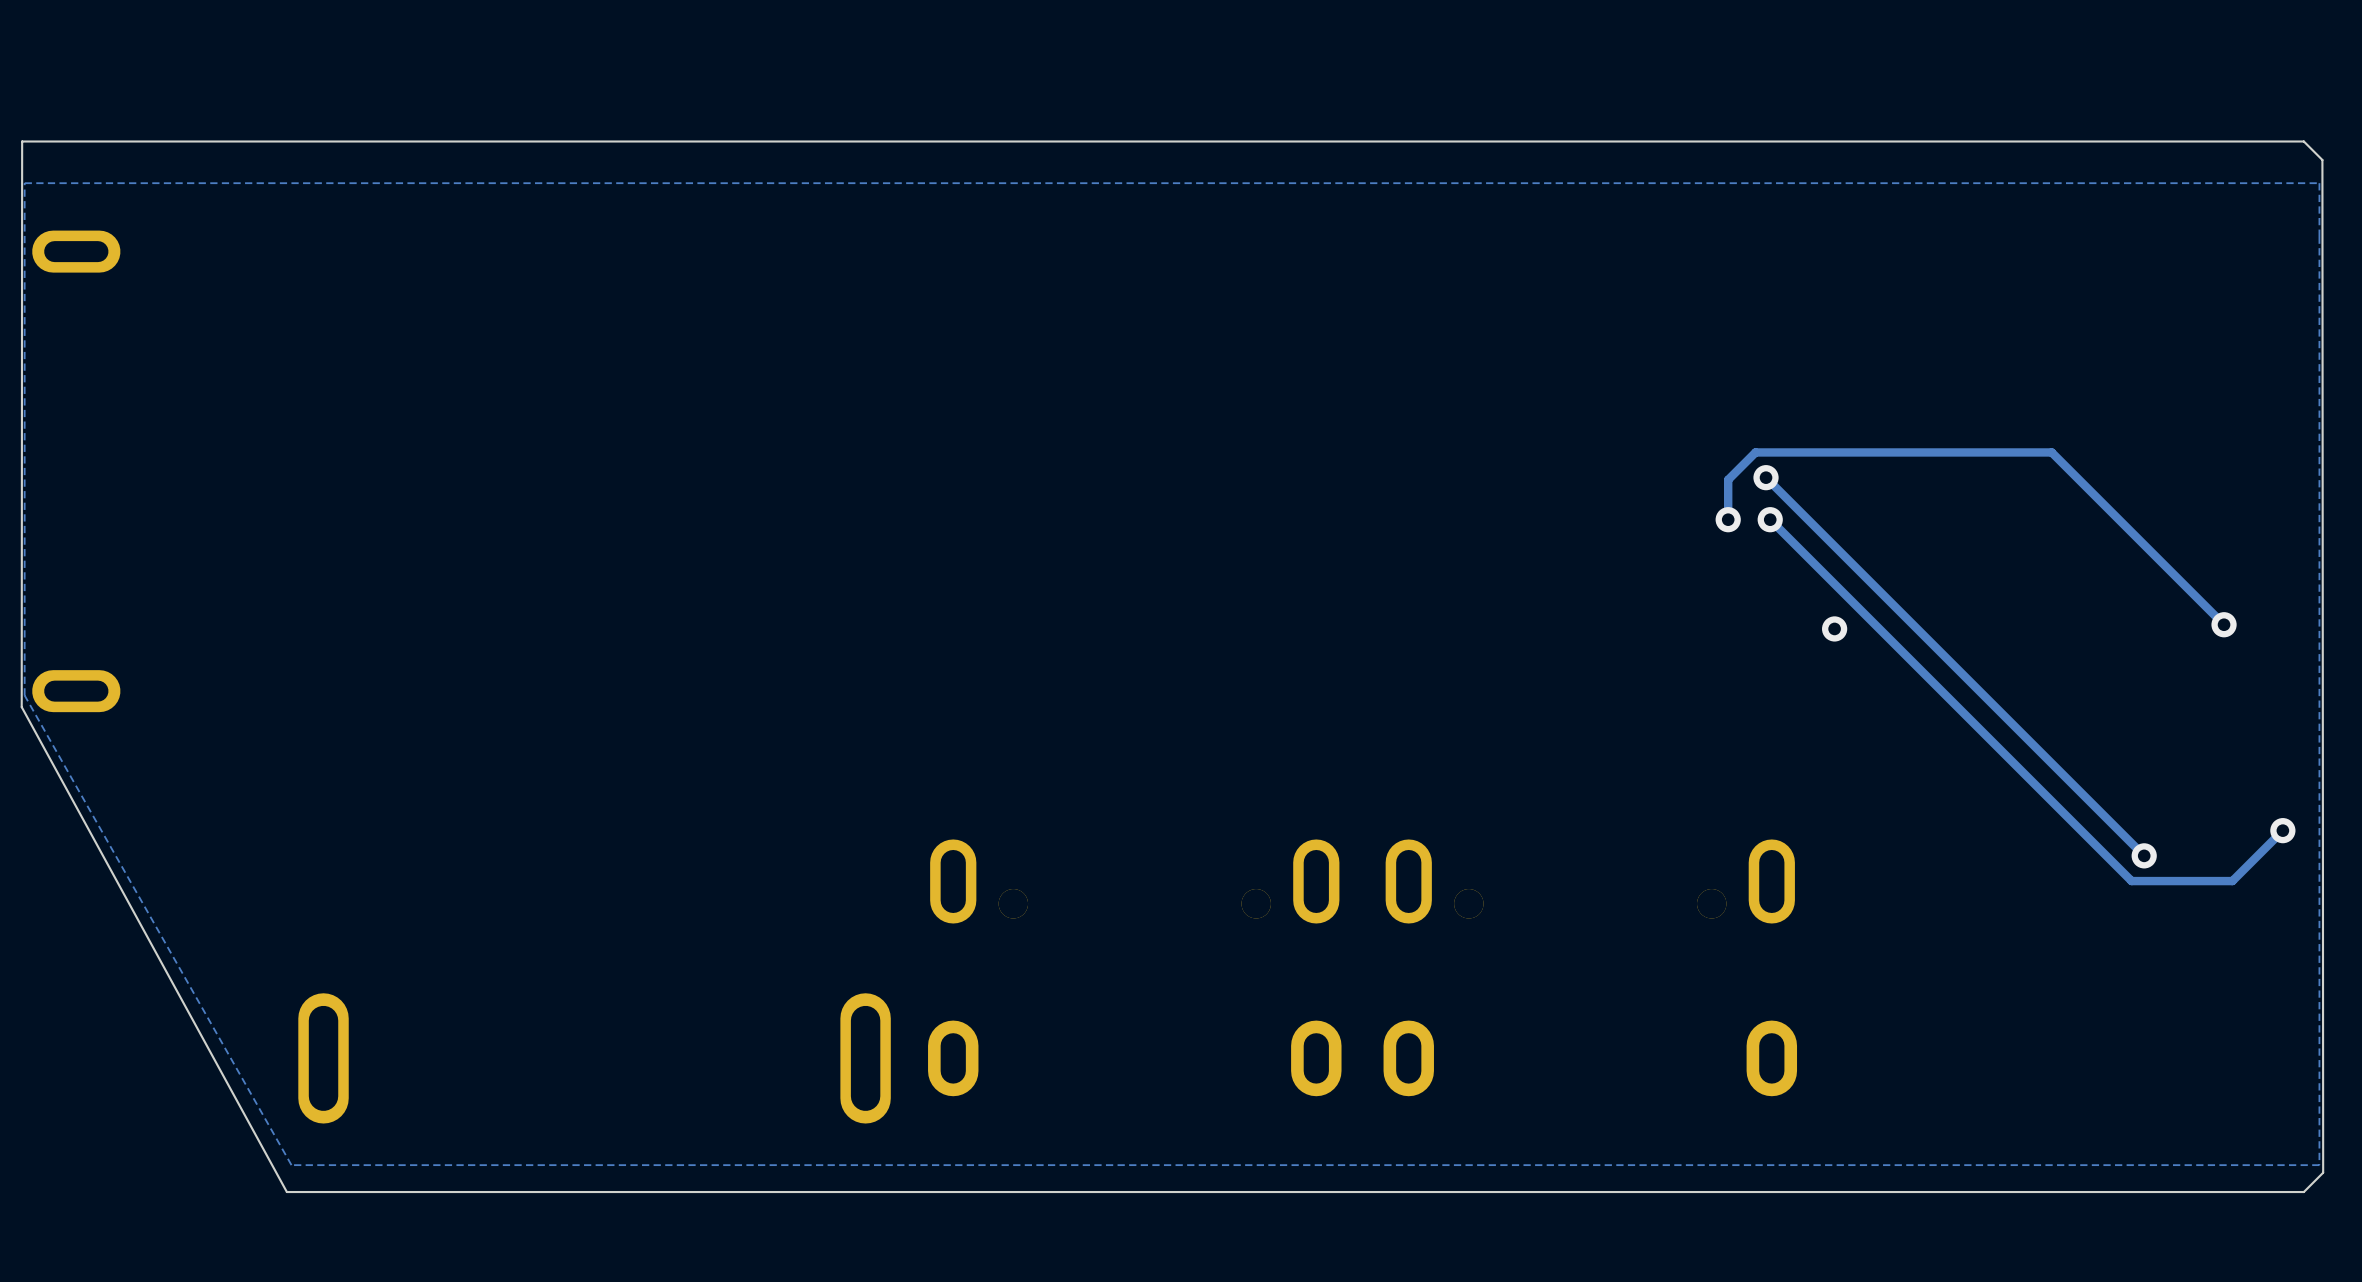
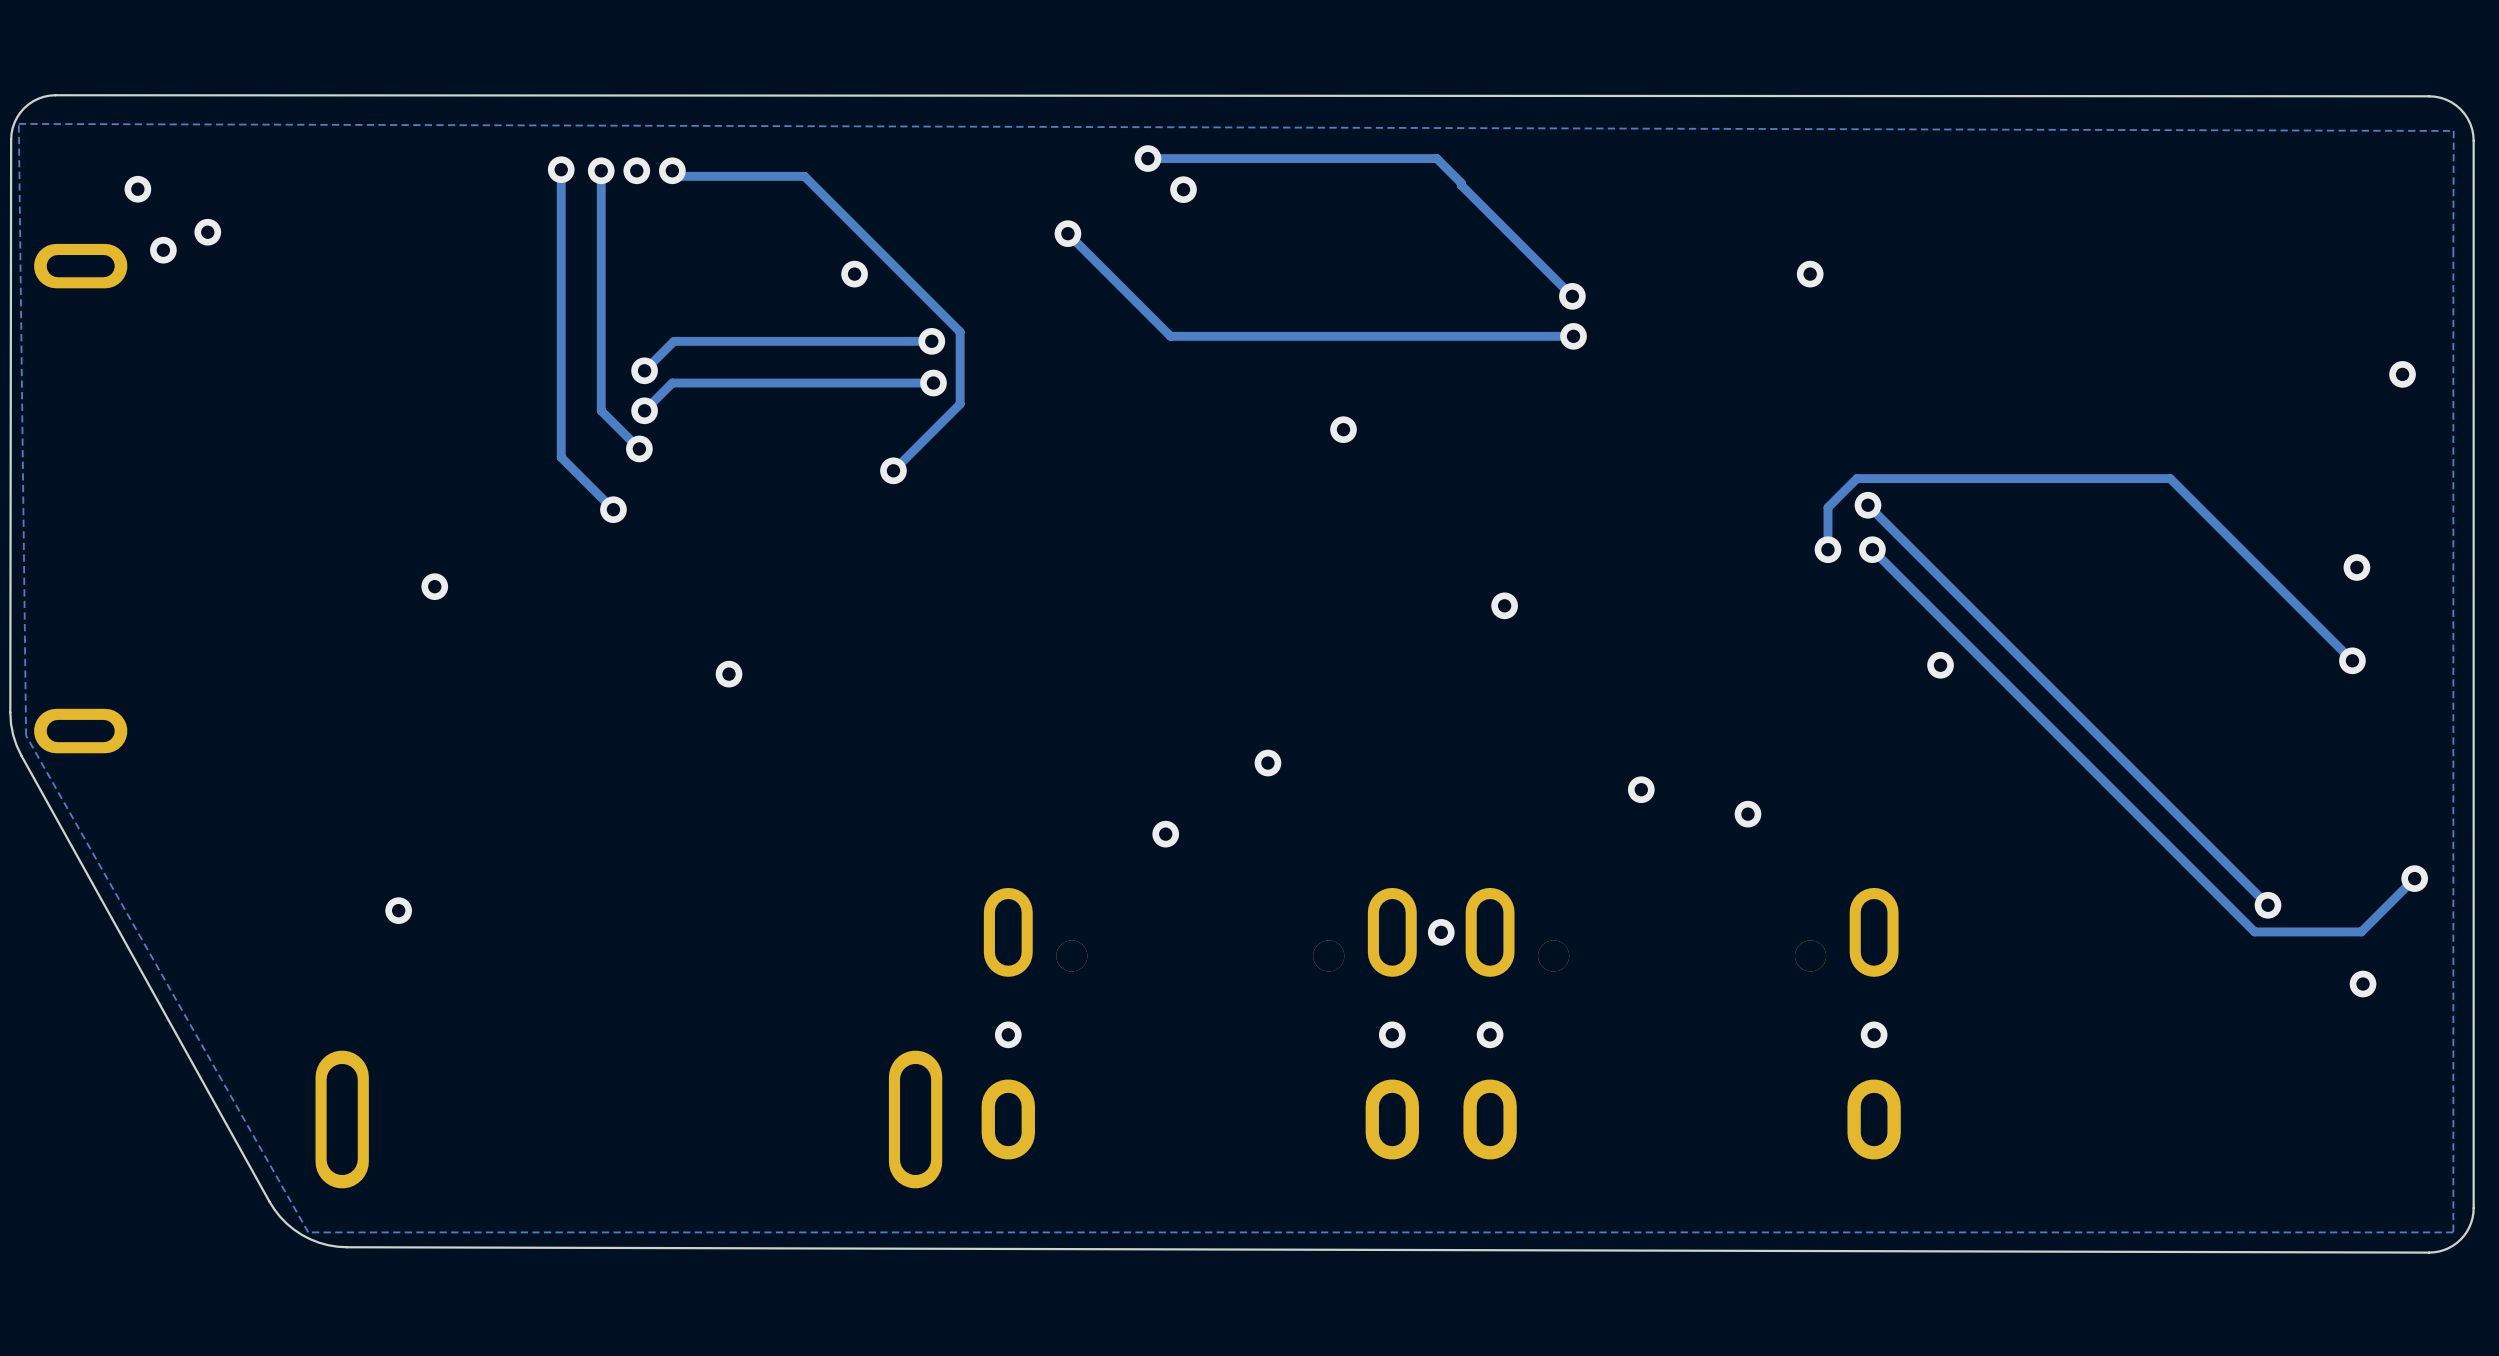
board edge: (2303, 141) (22, 141) (21, 707) (286, 1192) (2303, 1192) (2323, 1172) (2322, 160) (2303, 141) -> (55, 95) (2429, 96) (2446, 99) (2456, 105) (2464, 113) (2472, 129) (2473, 140) (2473, 1208) (2469, 1227) (2463, 1235) (2452, 1245) (2443, 1250) (2429, 1252) (346, 1247) (328, 1245) (310, 1239) (286, 1223) (269, 1201) (21, 755) (13, 734) (10, 712) (11, 139) (14, 122) (24, 108) (38, 98) (55, 95)
track: none -> (1147, 158) (1436, 158) (1572, 296)
via: none -> (1147, 158)
track: none -> (561, 169) (561, 457) (613, 509)
via: none -> (561, 169)
track: none -> (601, 170) (601, 410) (639, 448)
via: none -> (601, 170)
via: none -> (636, 170)
via: none -> (672, 170)
track: none -> (672, 176) (804, 176) (960, 331) (960, 404) (893, 470)
via: none -> (137, 189)
via: none -> (1183, 189)
via: none -> (207, 232)
track: none -> (1067, 233) (1170, 336) (1573, 336)
via: none -> (1067, 233)
via: none -> (163, 250)
zone outline: (2319, 236) (2319, 183) (24, 183) (24, 695) -> (2453, 250) (2453, 130) (18, 123) (26, 735)
via: none -> (854, 274)
via: none -> (1810, 274)
via: none -> (1572, 296)
via: none -> (1573, 336)
track: none -> (931, 341) (674, 341) (644, 370)
via: none -> (931, 341)
via: none -> (644, 370)
via: none -> (2402, 374)
track: none -> (933, 383) (672, 383) (644, 410)
via: none -> (933, 383)
via: none -> (644, 410)
via: none -> (1343, 429)
via: none -> (639, 448)
via: none -> (893, 470)
via: none -> (613, 509)
via: none -> (2356, 567)
via: none -> (434, 586)
via: none -> (1504, 605)
via: none -> (729, 674)
via: none -> (1267, 763)
via: none -> (1641, 789)
via: none -> (1747, 814)
via: none -> (1165, 834)
via: none -> (398, 910)
via: none -> (1441, 932)
via: none -> (2363, 984)
via: none -> (1008, 1034)
via: none -> (1392, 1034)
via: none -> (1490, 1034)
via: none -> (1874, 1034)

